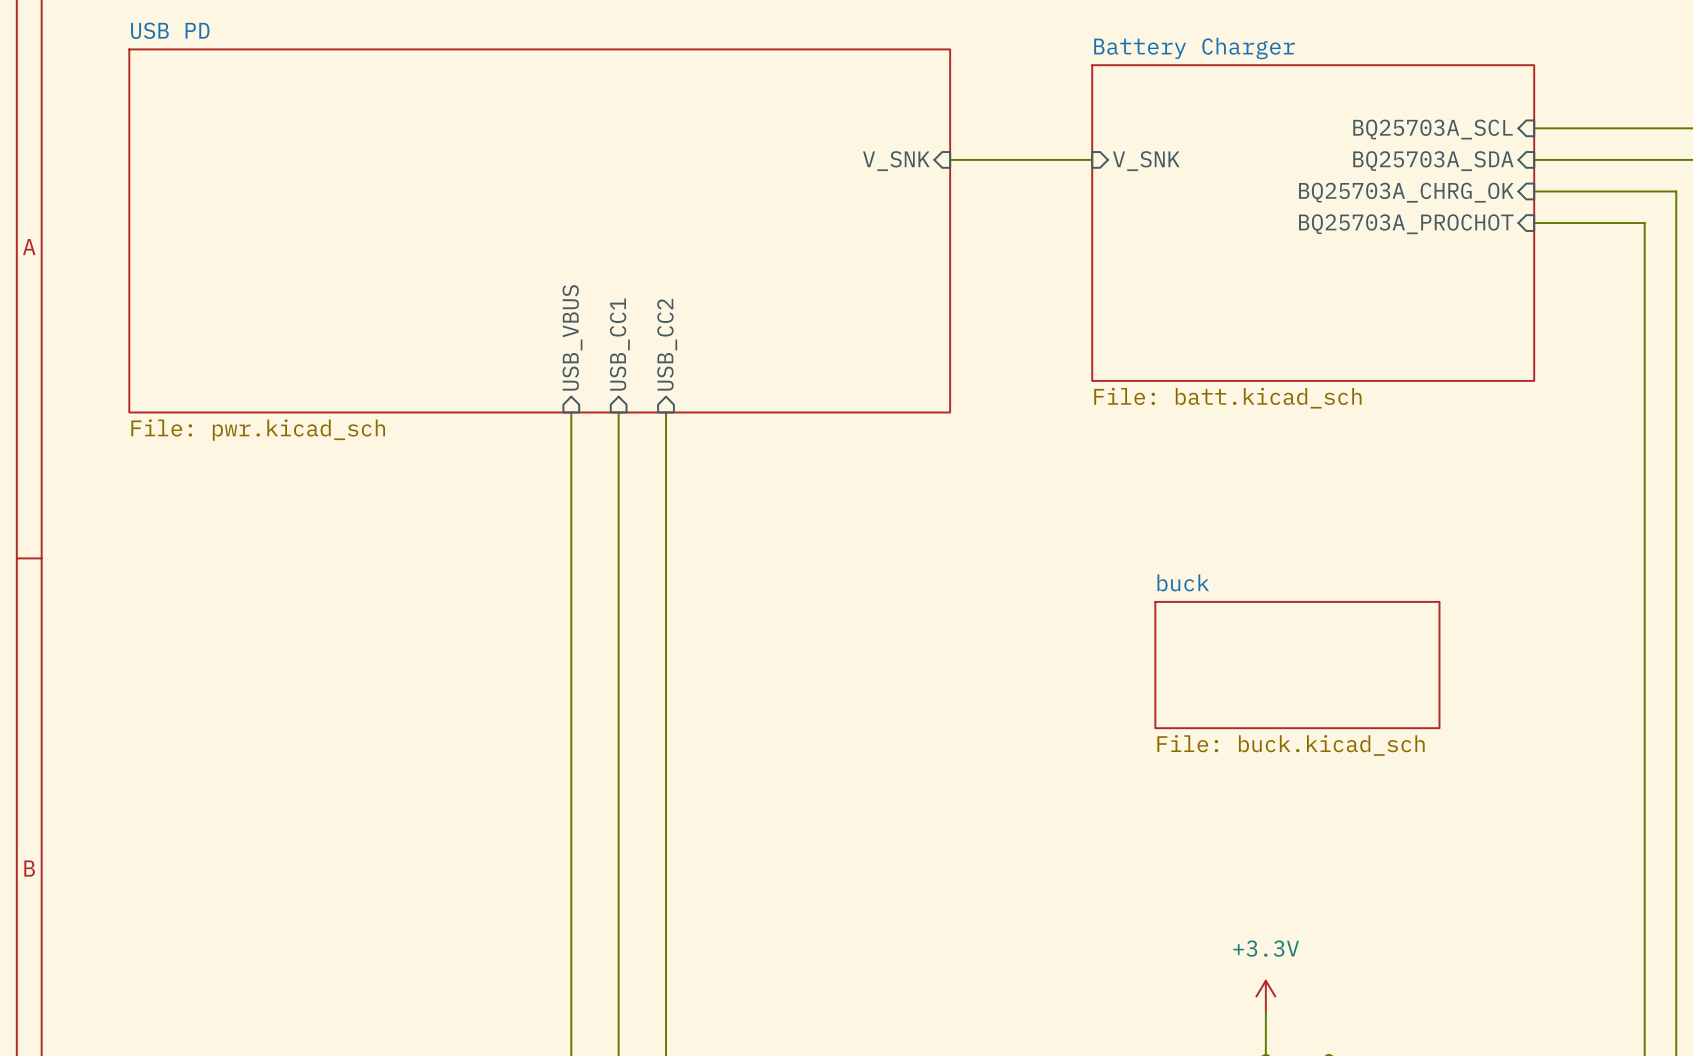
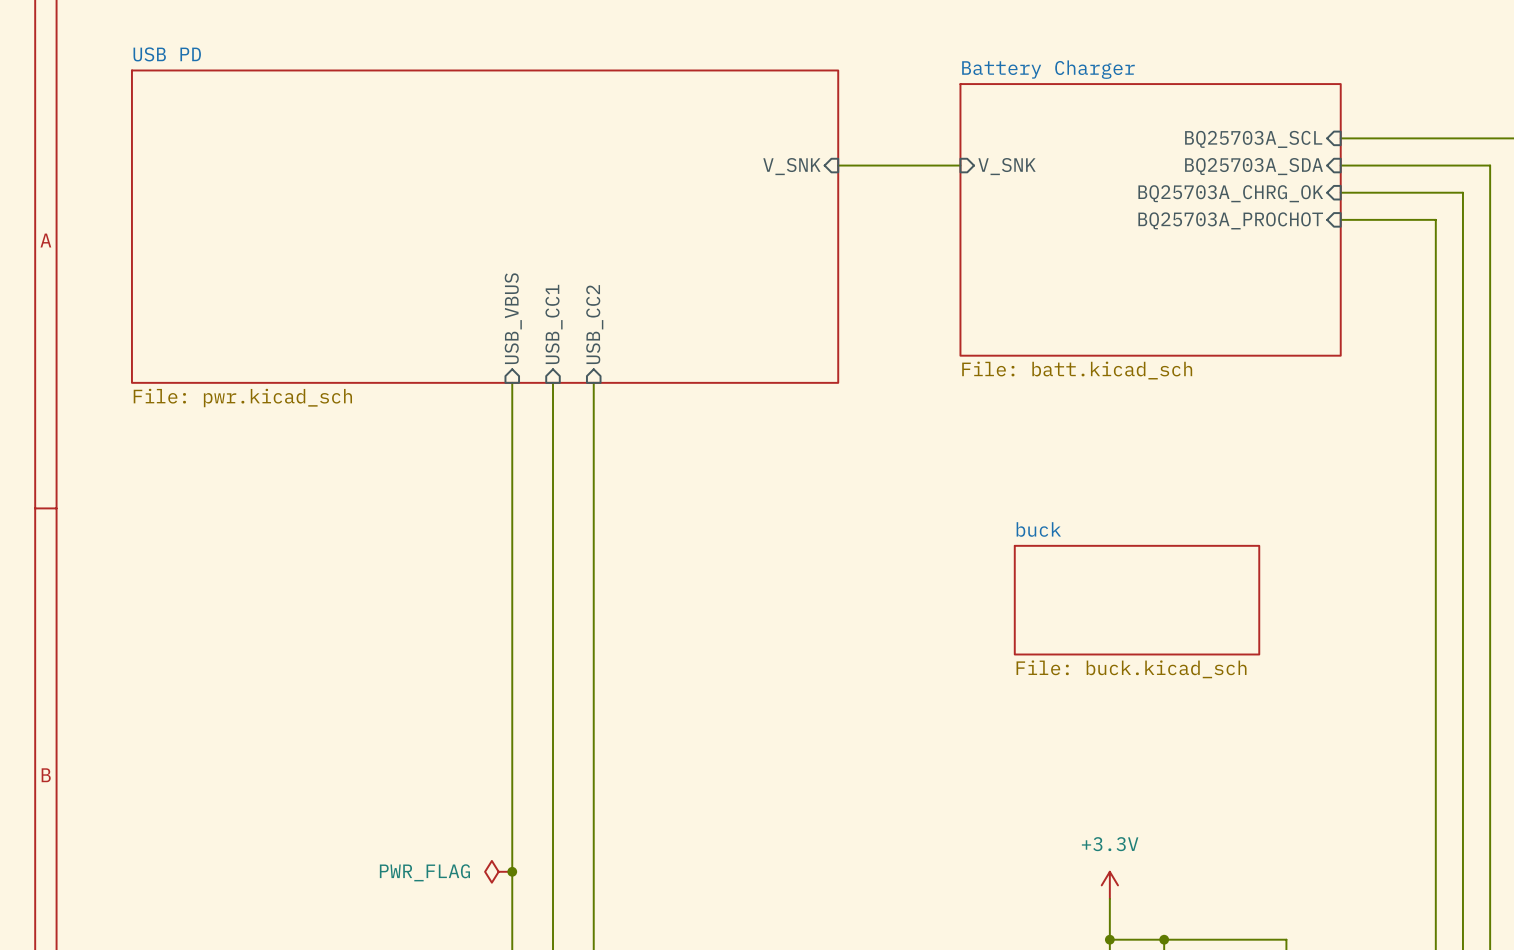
power symbol: none -> PWR_FLAG (498, 871)
junction: none -> (512, 871)

